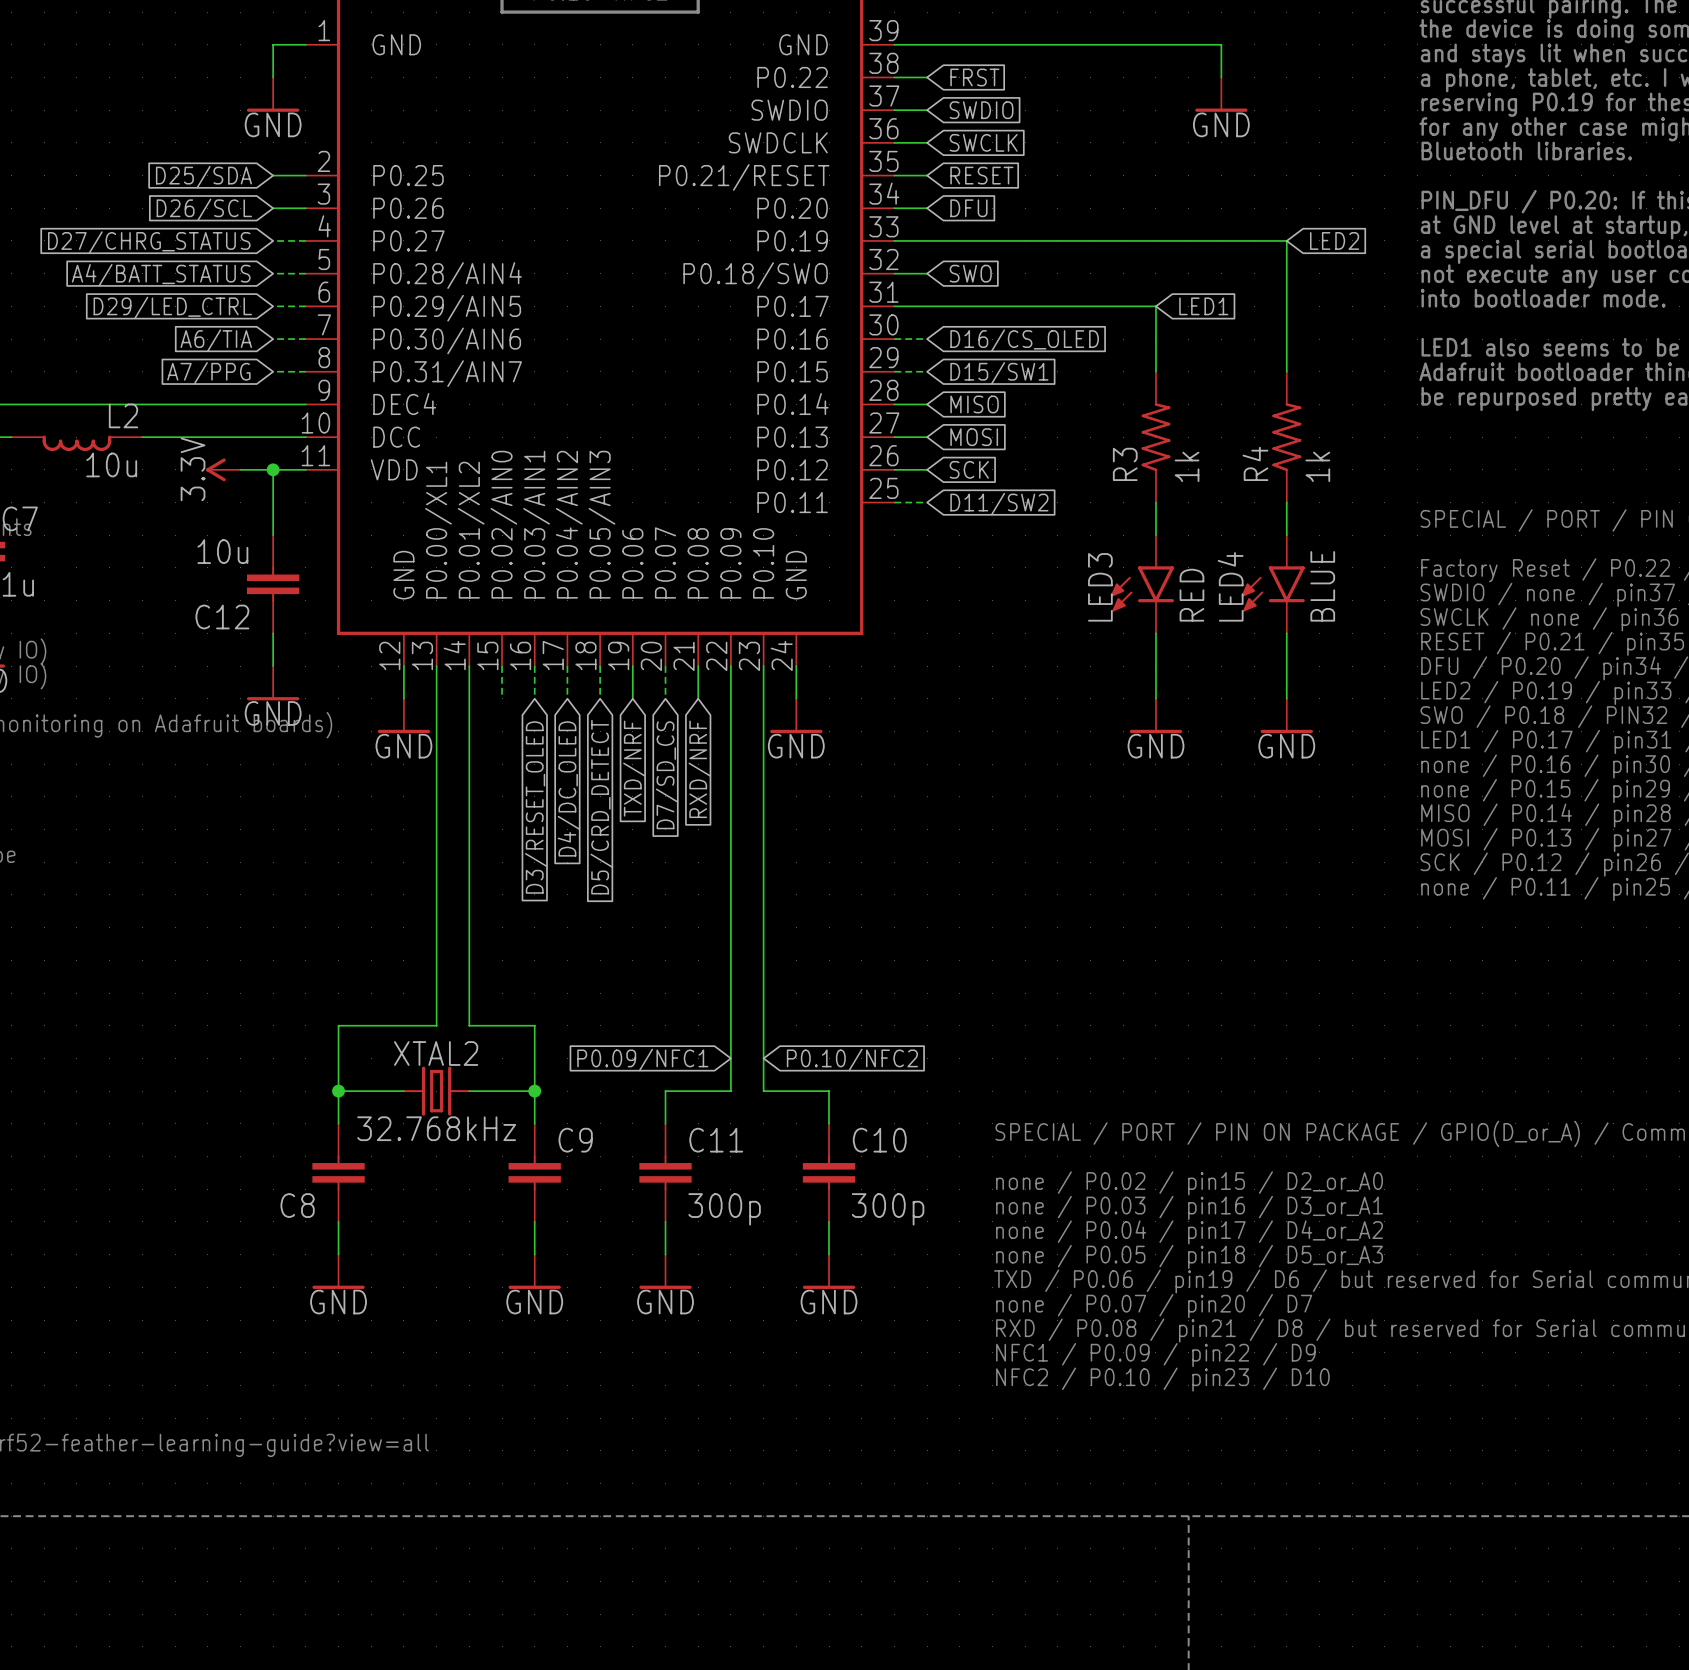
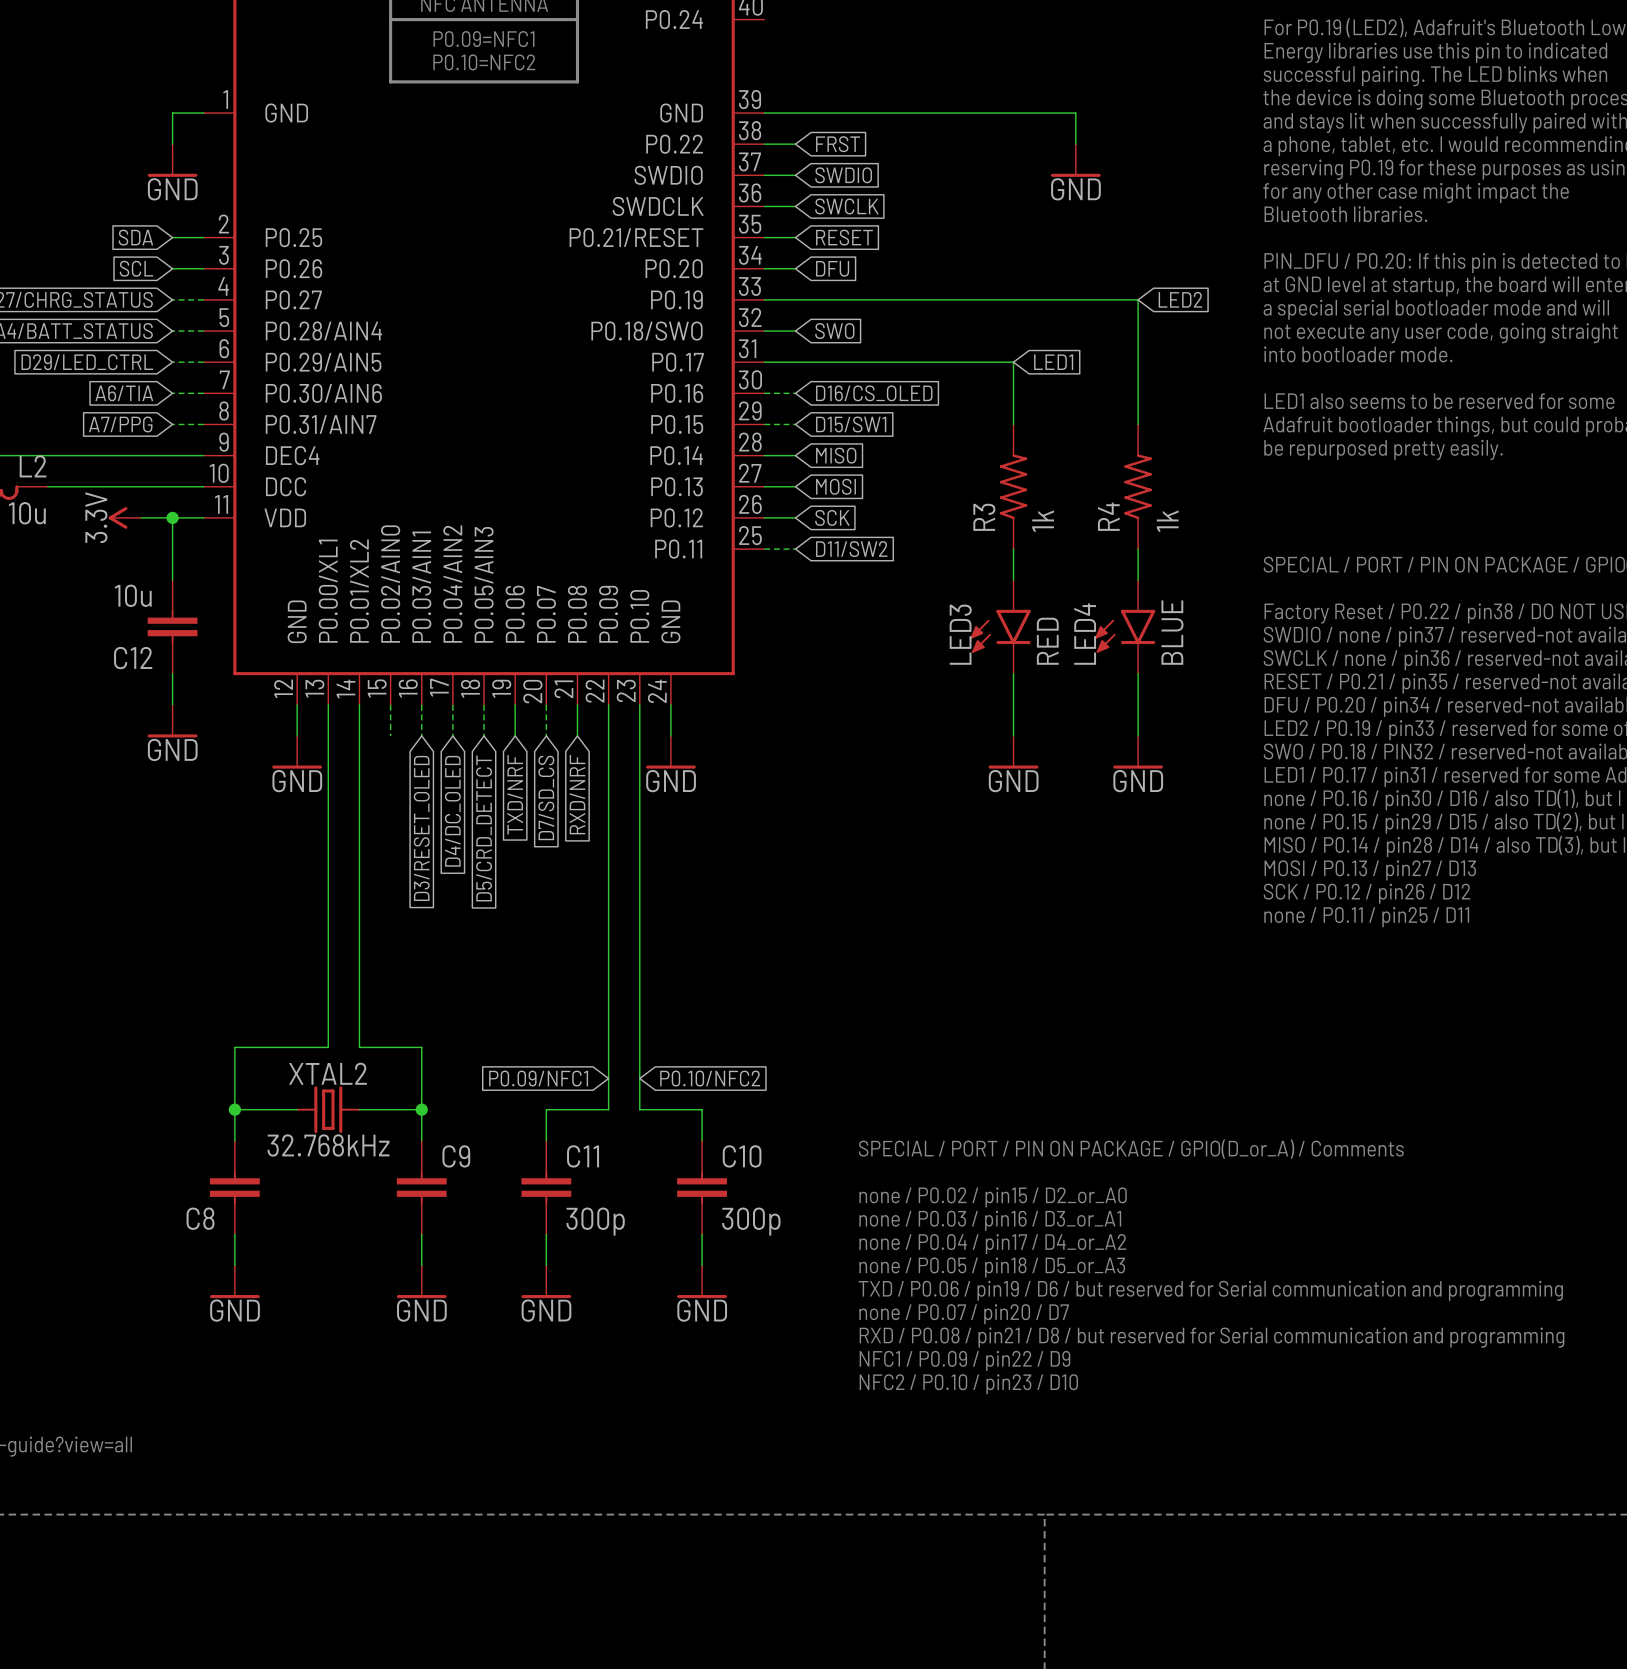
global label: D25/SDA (203, 177) -> SDA (135, 237)
global label: D26/SCL (204, 209) -> SCL (136, 268)

